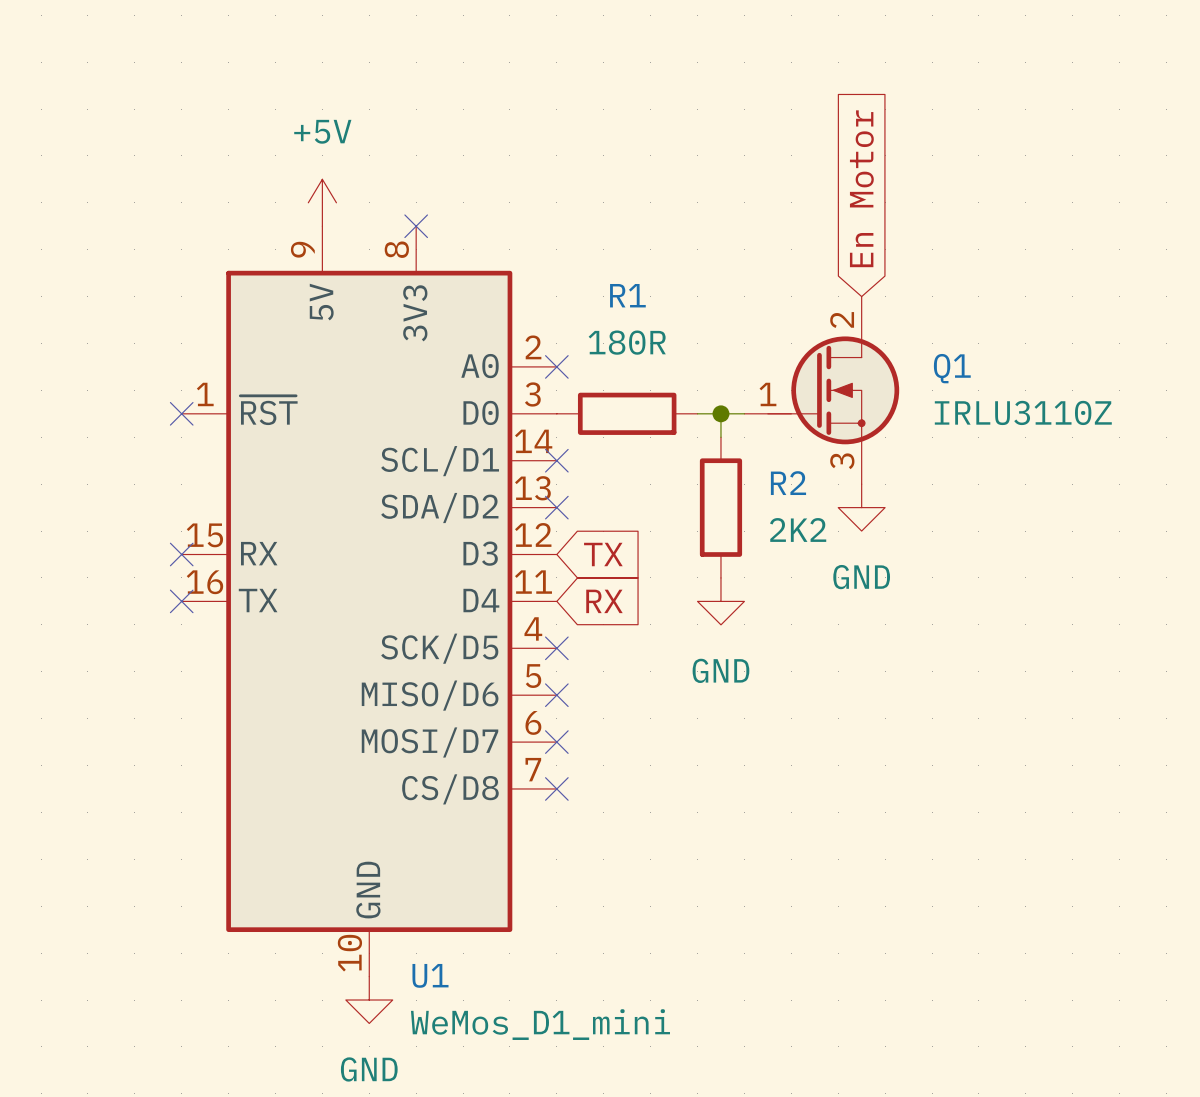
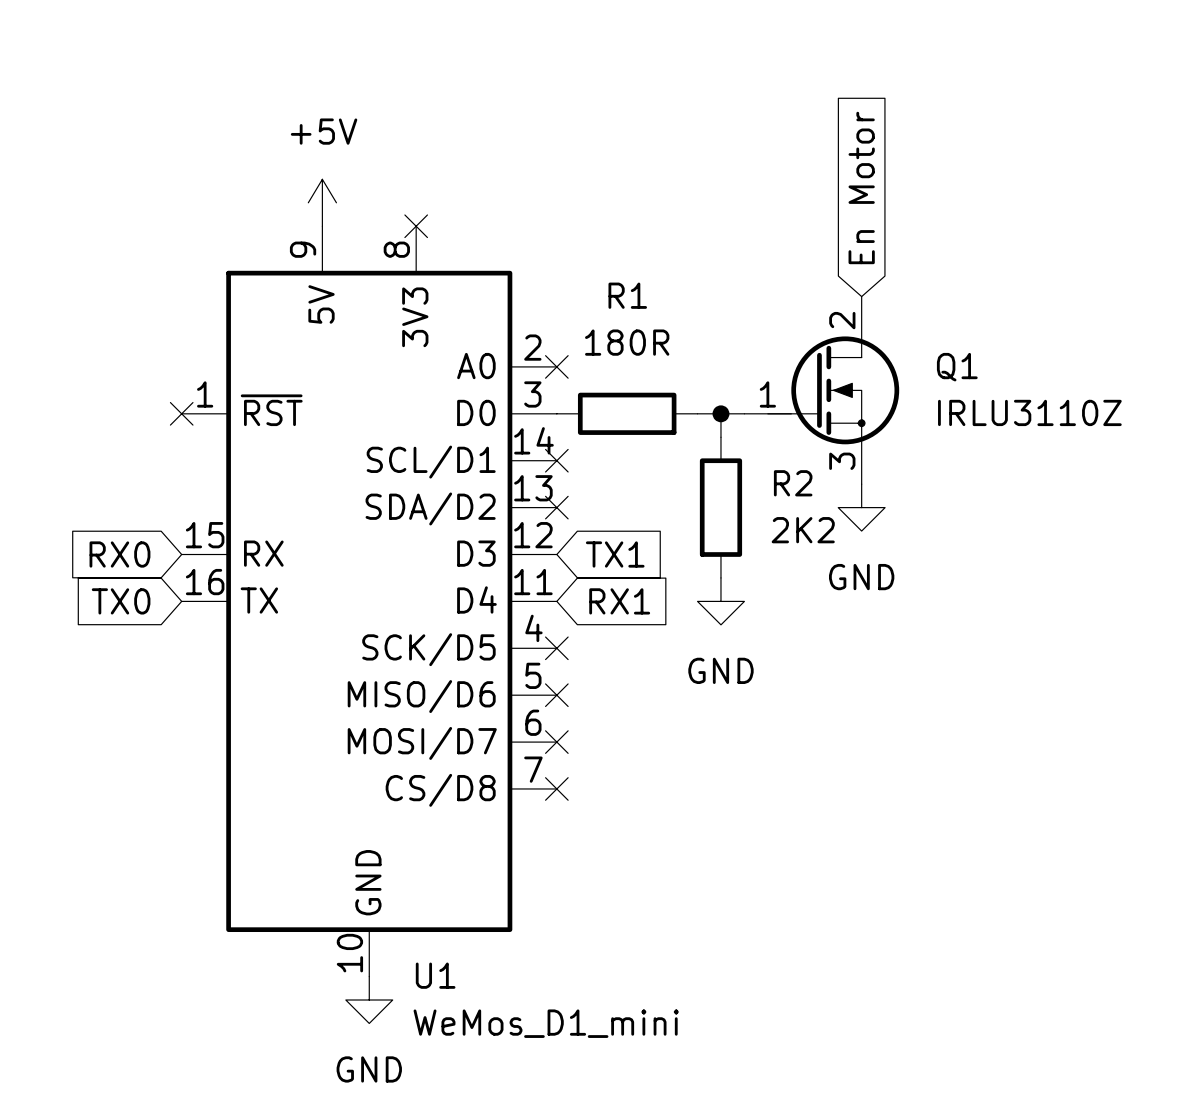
global label: none -> RX0 (119, 554)
no-connect mark: (181, 554) -> none
global label: TX (603, 554) -> TX1 (615, 554)
global label: none -> TX0 (121, 601)
no-connect mark: (181, 601) -> none
global label: RX (604, 601) -> RX1 (619, 601)

